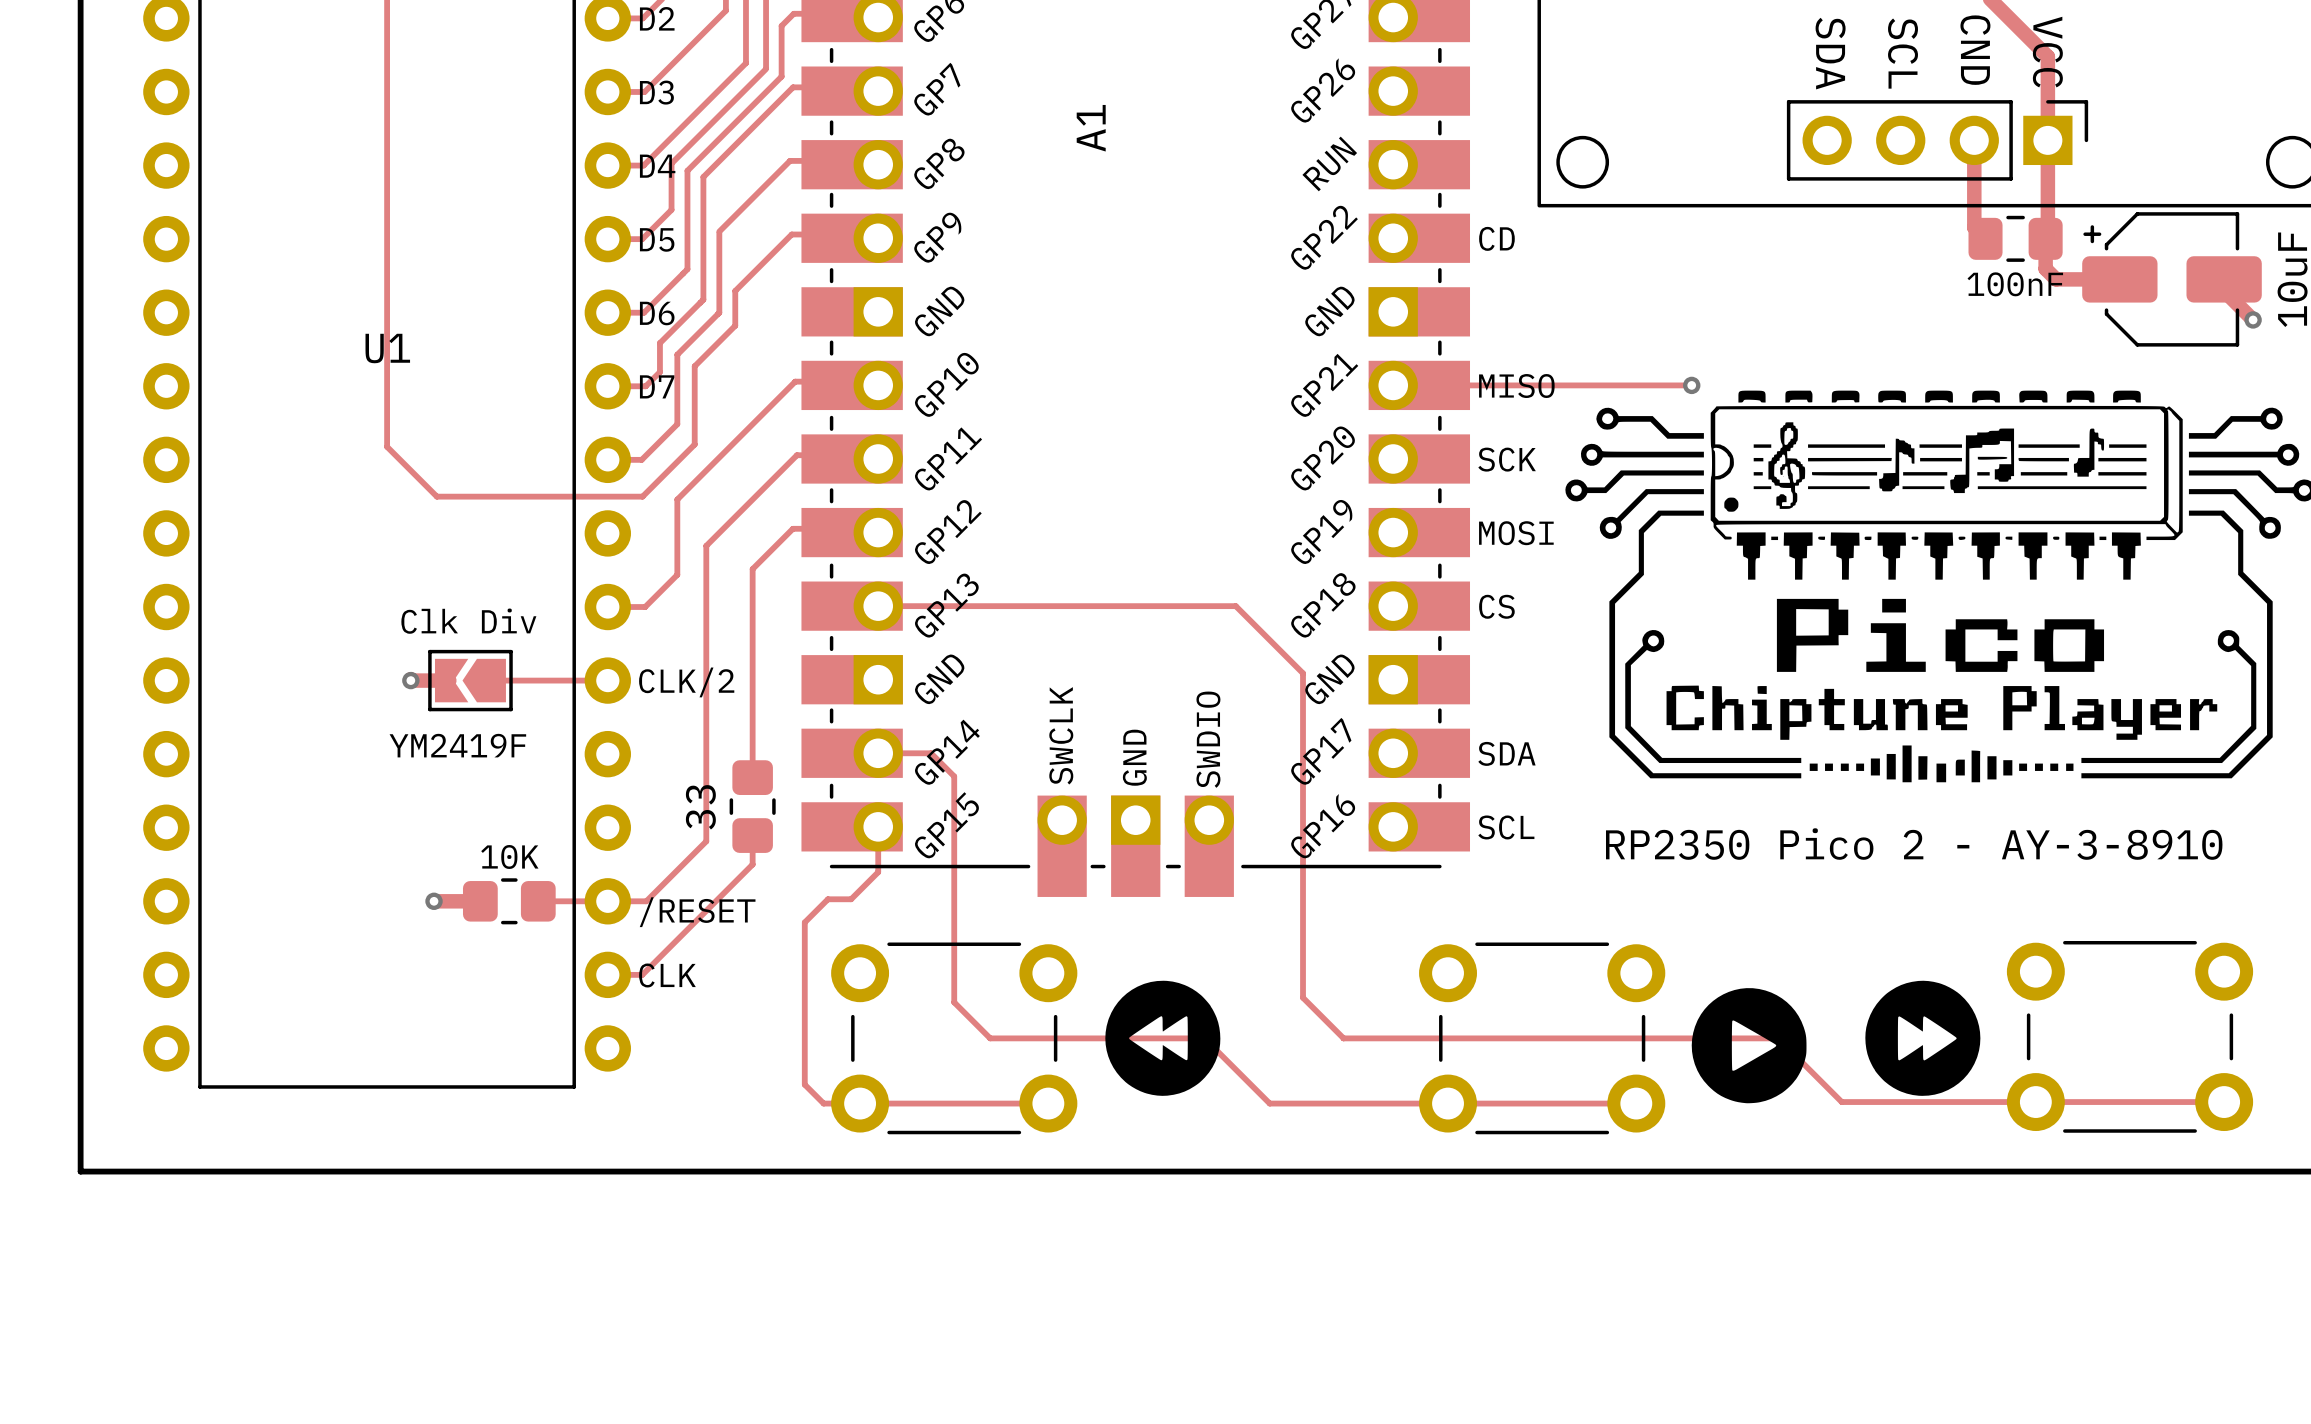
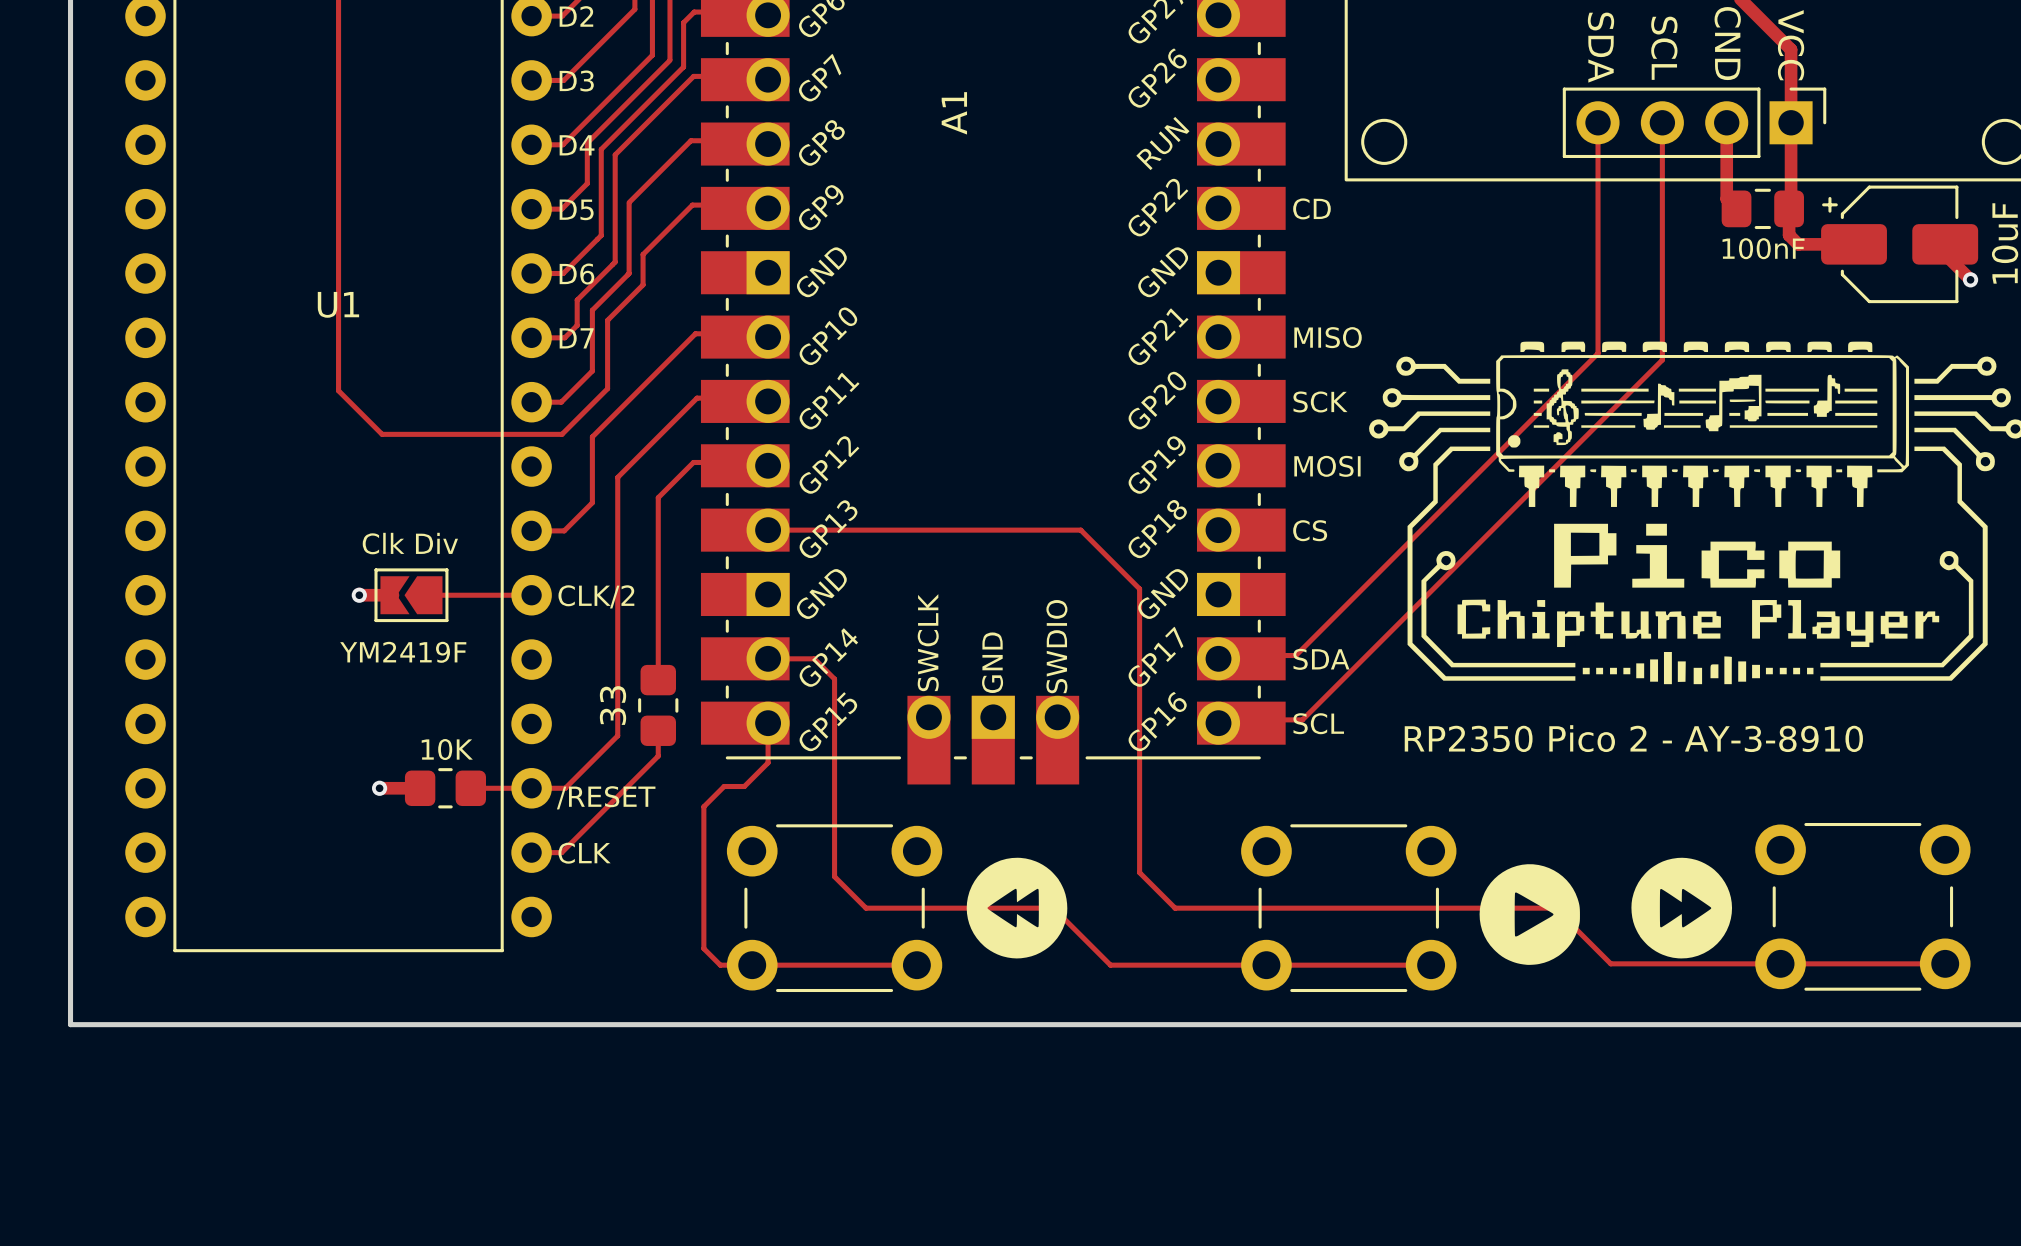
track: none -> (1598, 122) (1598, 353)
track: none -> (1662, 122) (1662, 360) (1302, 719) (1202, 719)
track: (1393, 385) (1691, 385) -> none
via: (1691, 385) -> none
track: none -> (1598, 353) (1295, 655) (1202, 655)

